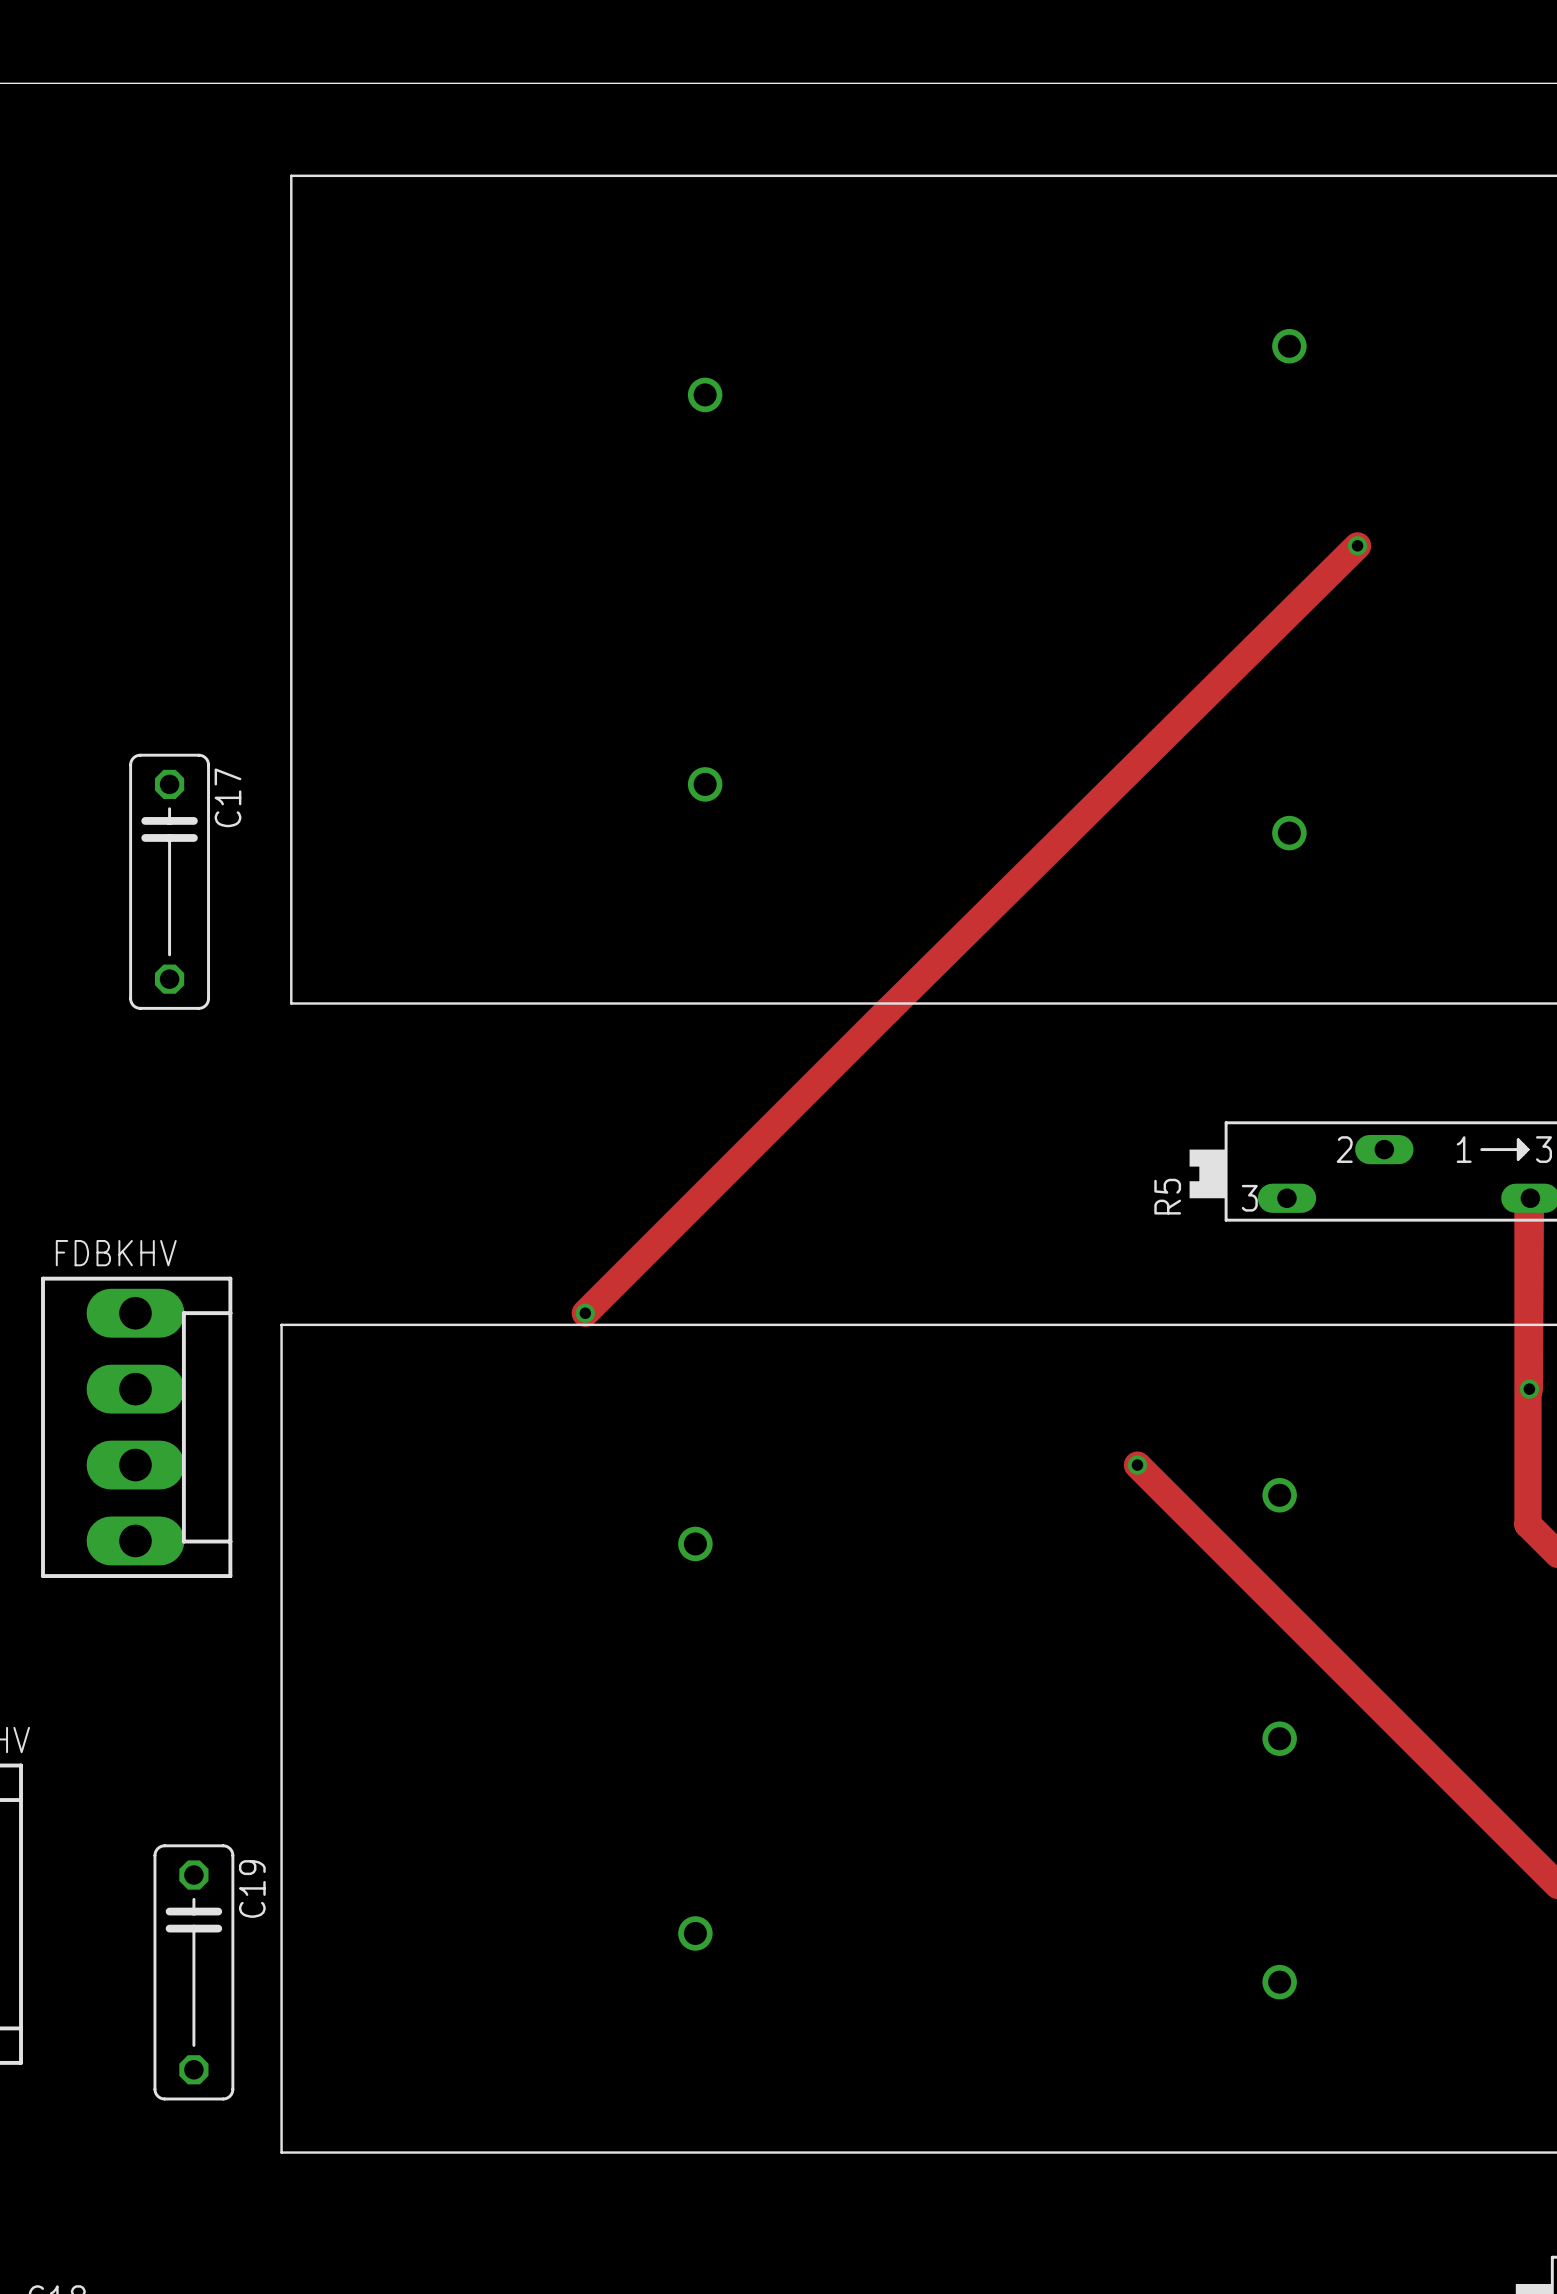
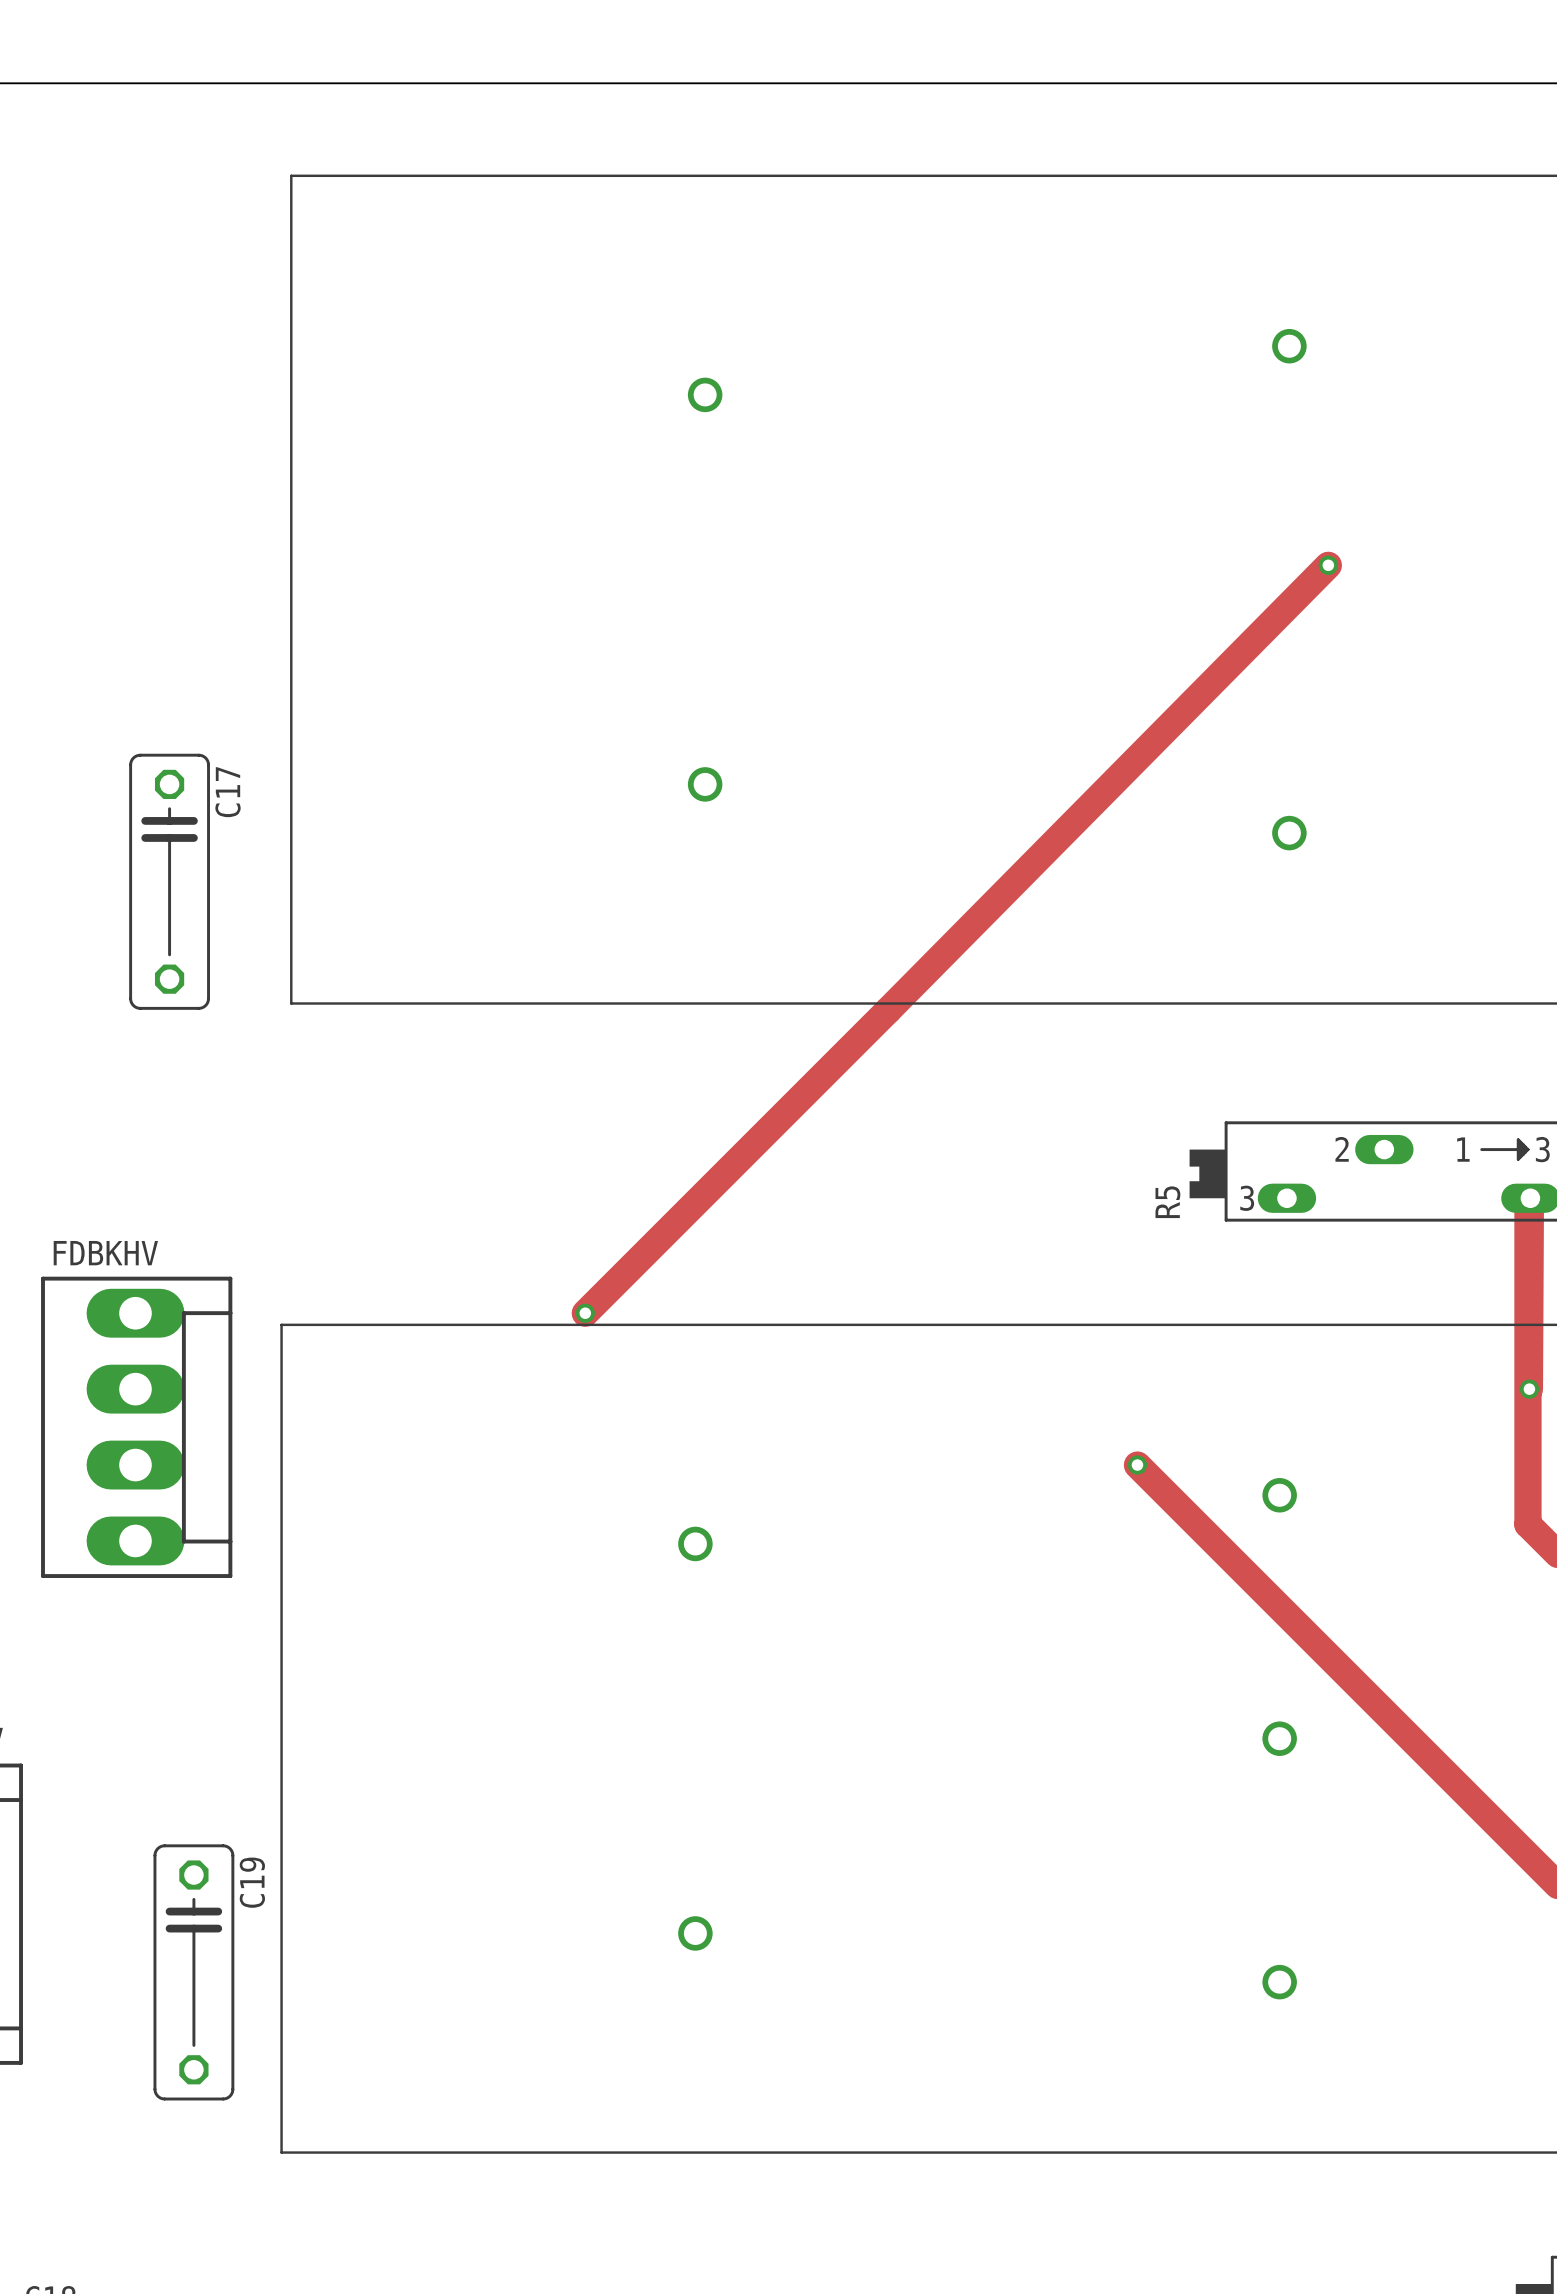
track: (1357, 545) (888, 1010) -> (1328, 565) (888, 1010)
via position: (1357, 545) -> (1328, 565)

